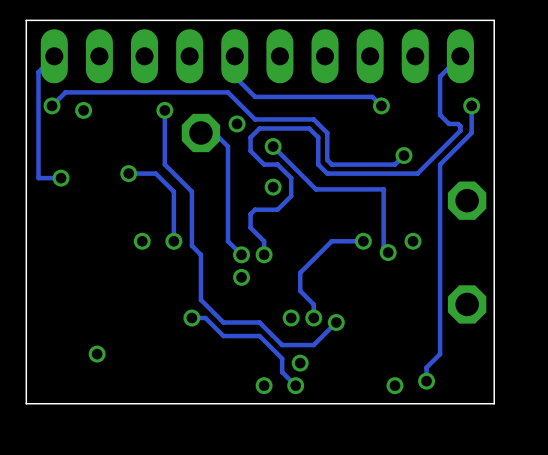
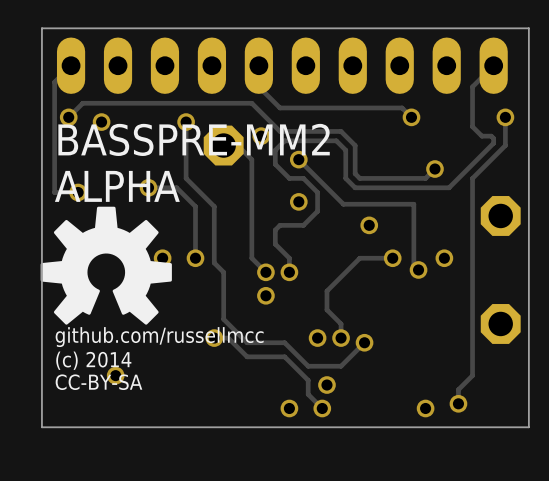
text: none -> BASSPRE-MM2 (194, 139)
text: none -> ALPHA (117, 186)
drawing: none -> [40, 206, 172, 325]
via: none -> (369, 225)
text: none -> github.com/russellmcc (159, 337)
text: none -> (c) 2014 (93, 360)
text: none -> CC-BY-SA (98, 382)

